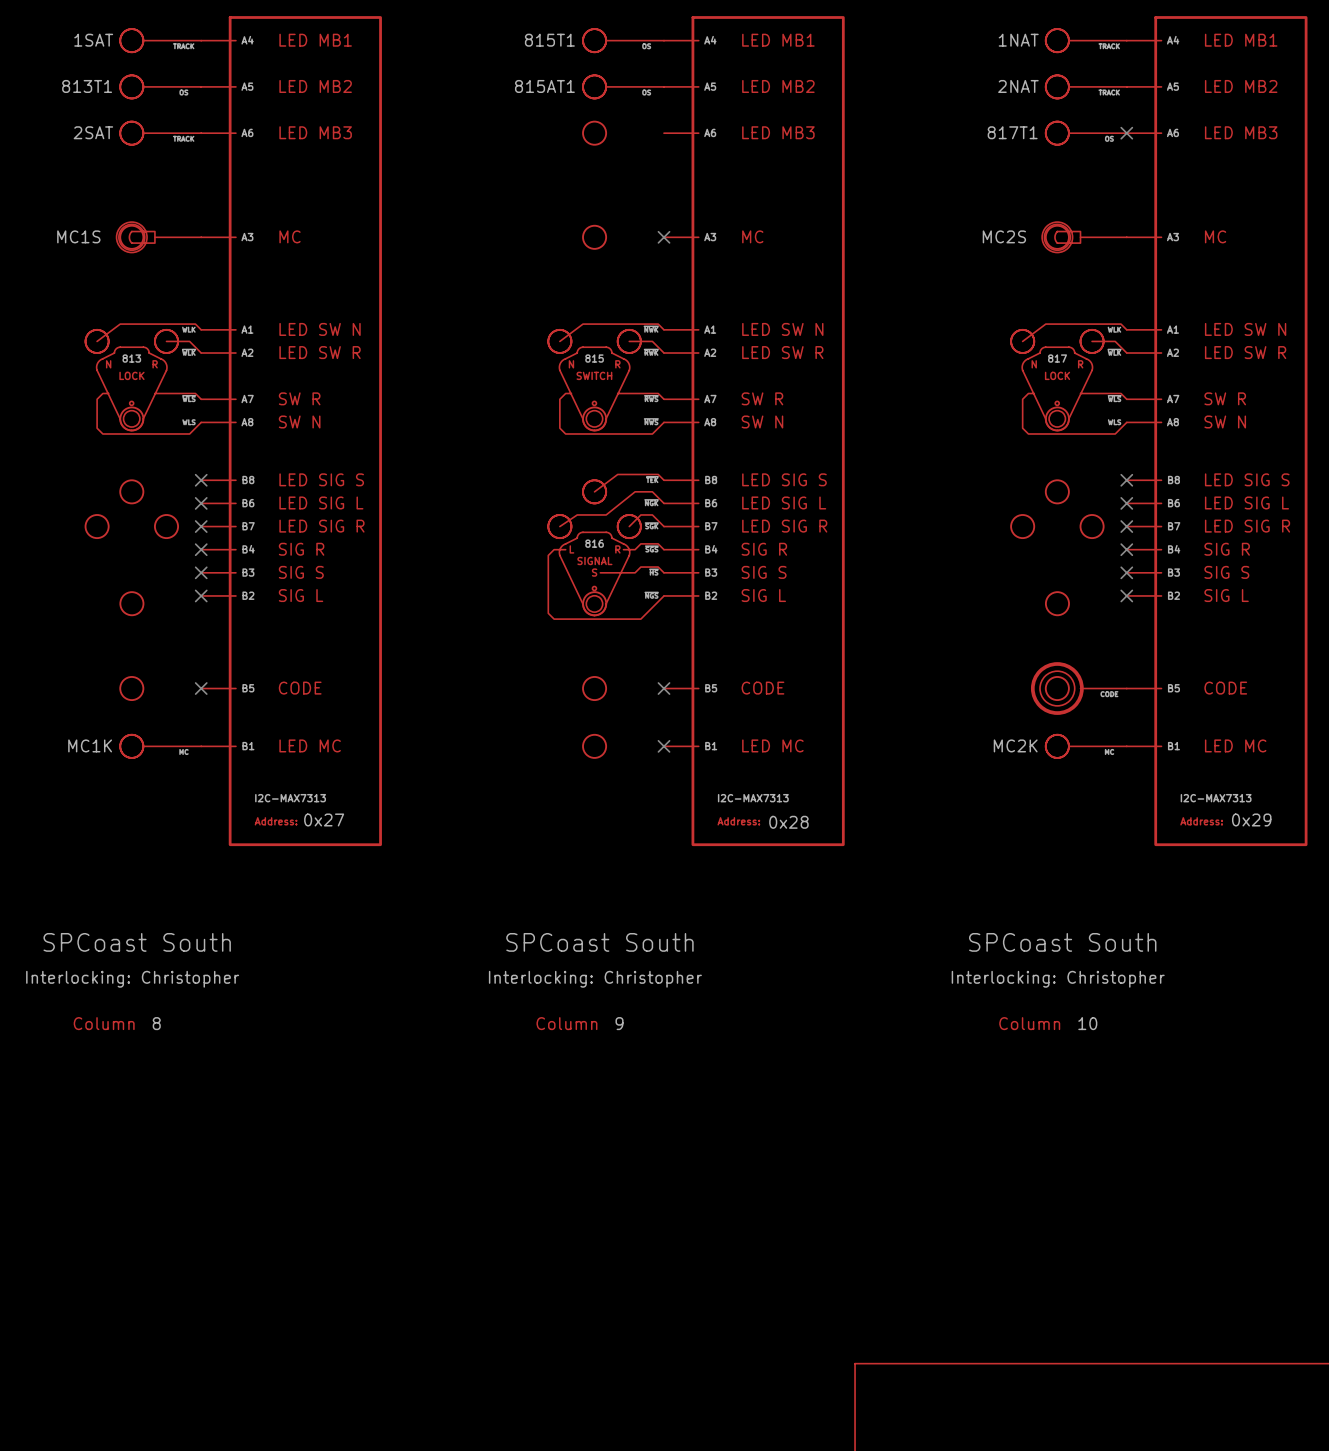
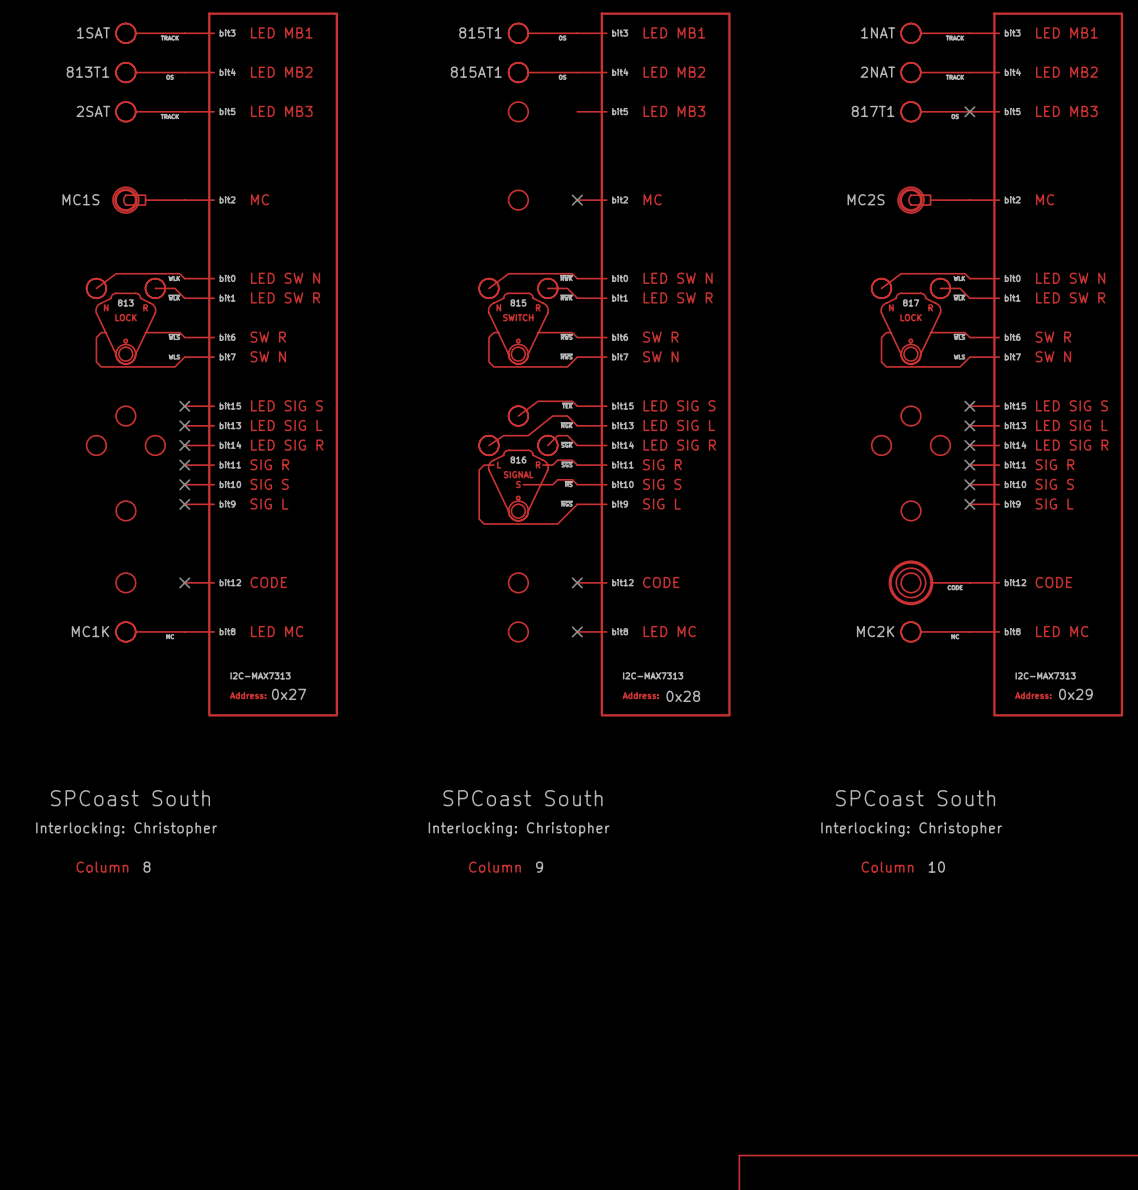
part symbol: [201, 16, 382, 847] -> [184, 12, 339, 717]
part symbol: [664, 16, 845, 847] -> [577, 12, 731, 717]
part symbol: [1126, 16, 1308, 847] -> [969, 12, 1124, 717]

